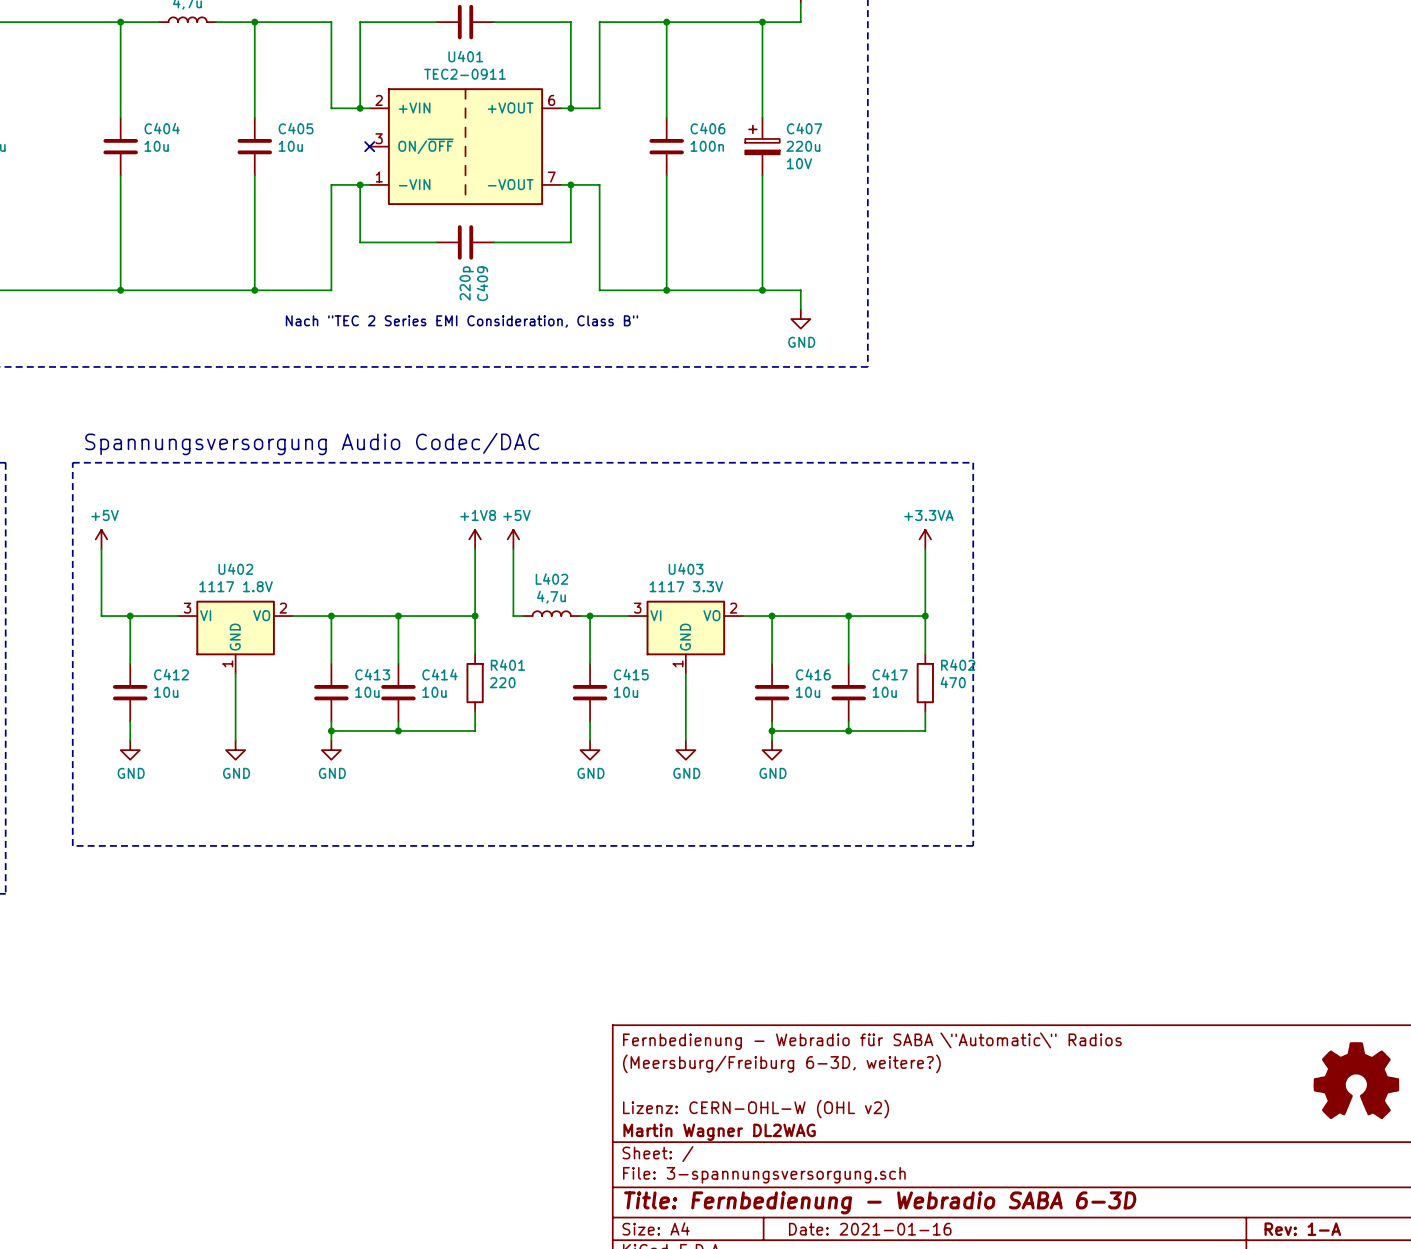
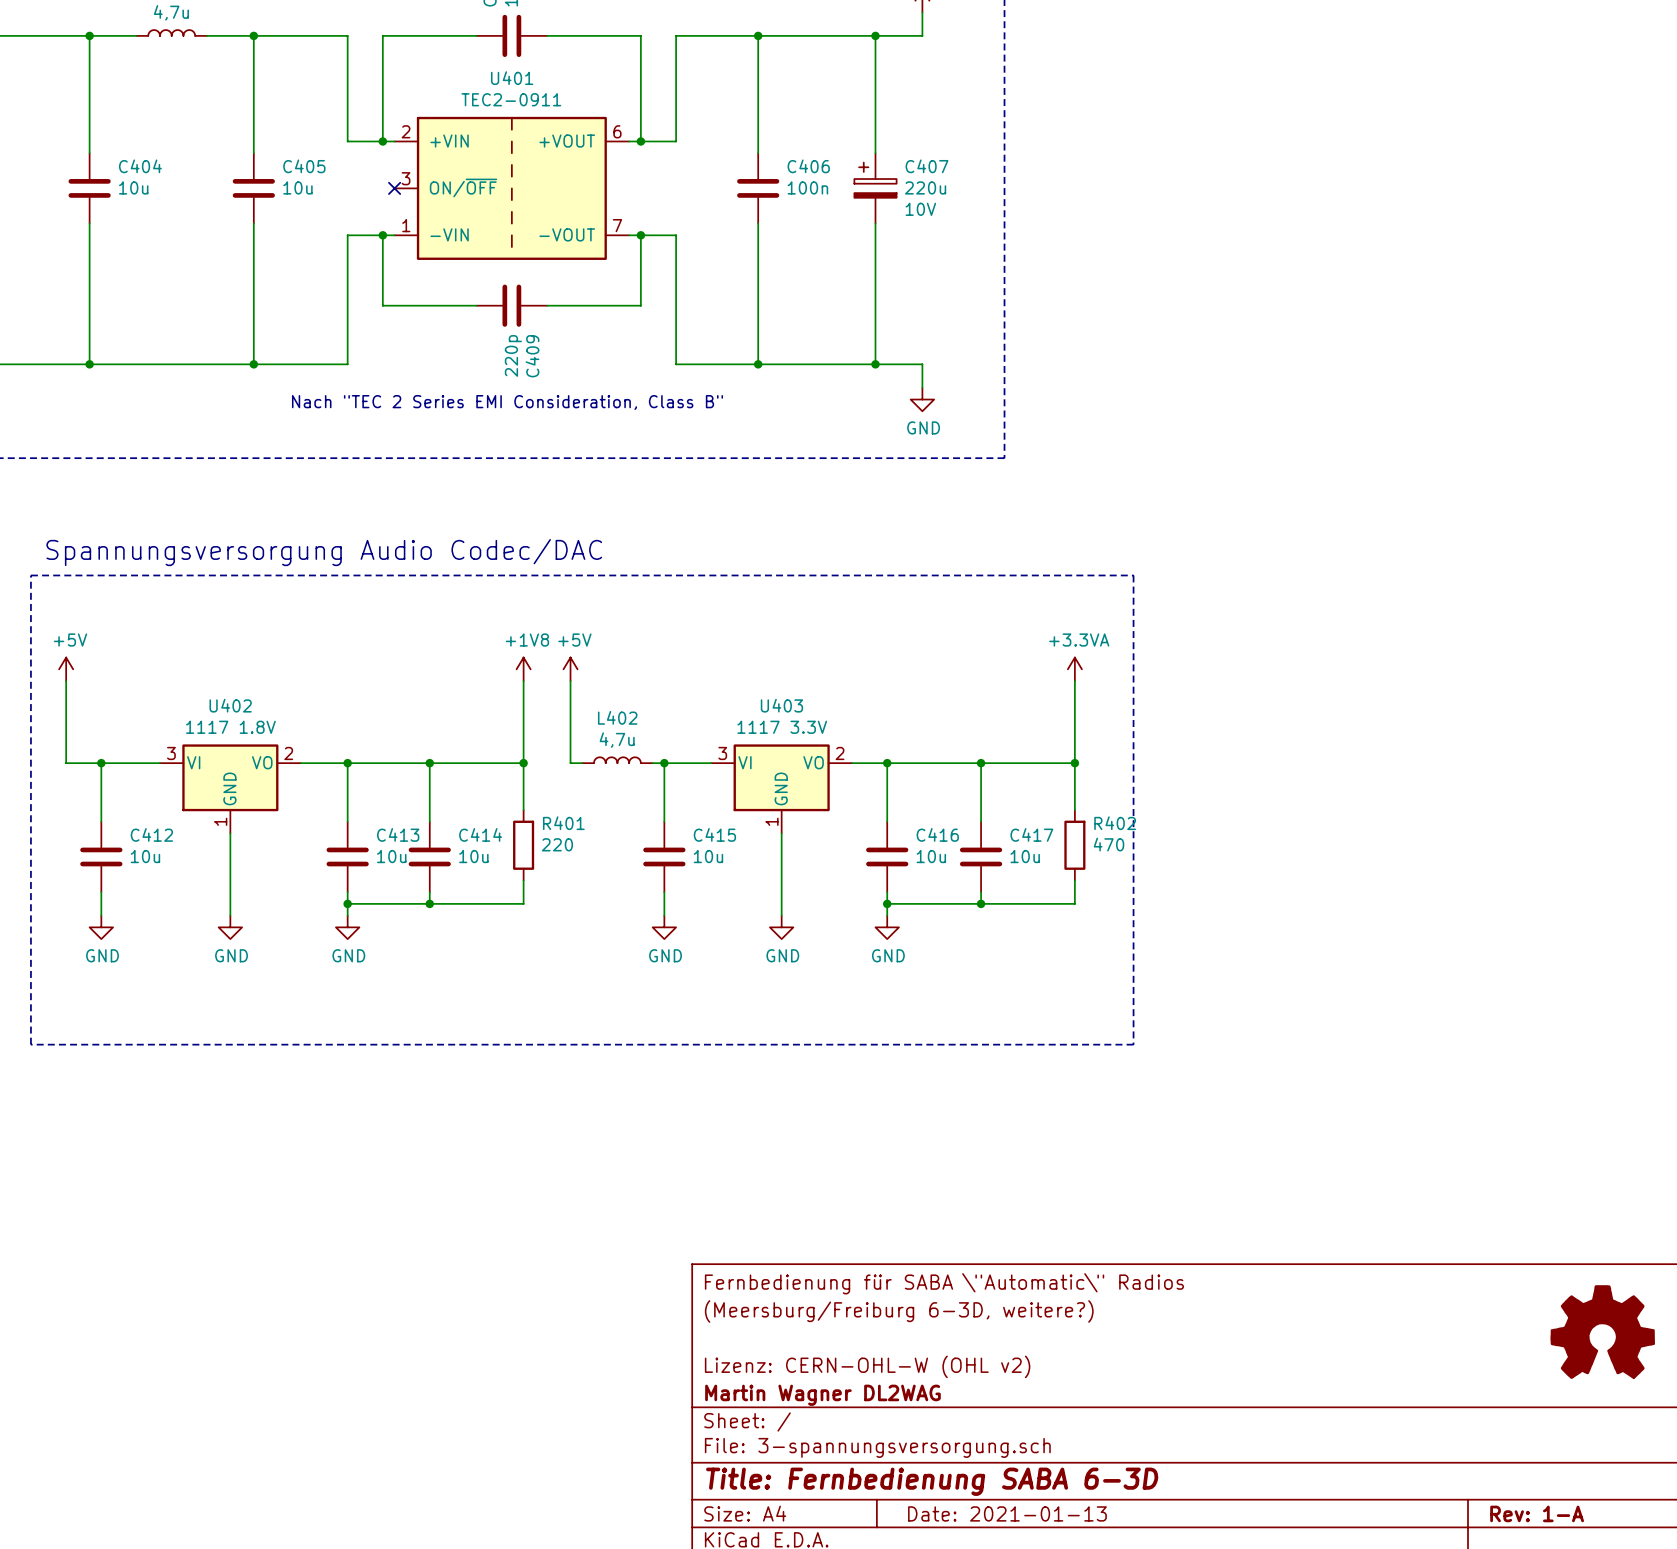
title block: Fernbedienung - Webradio für SABA \"Automatic\" Radios (872, 1041) -> Fernbedienung für SABA \"Automatic\" Radios (944, 1283)
title block: Title: Fernbedienung - Webradio SABA 6-3D (880, 1202) -> Title: Fernbedienung SABA 6-3D (932, 1481)
title block: Date: 2021-01-16 (870, 1229) -> Date: 2021-01-13 (1007, 1513)

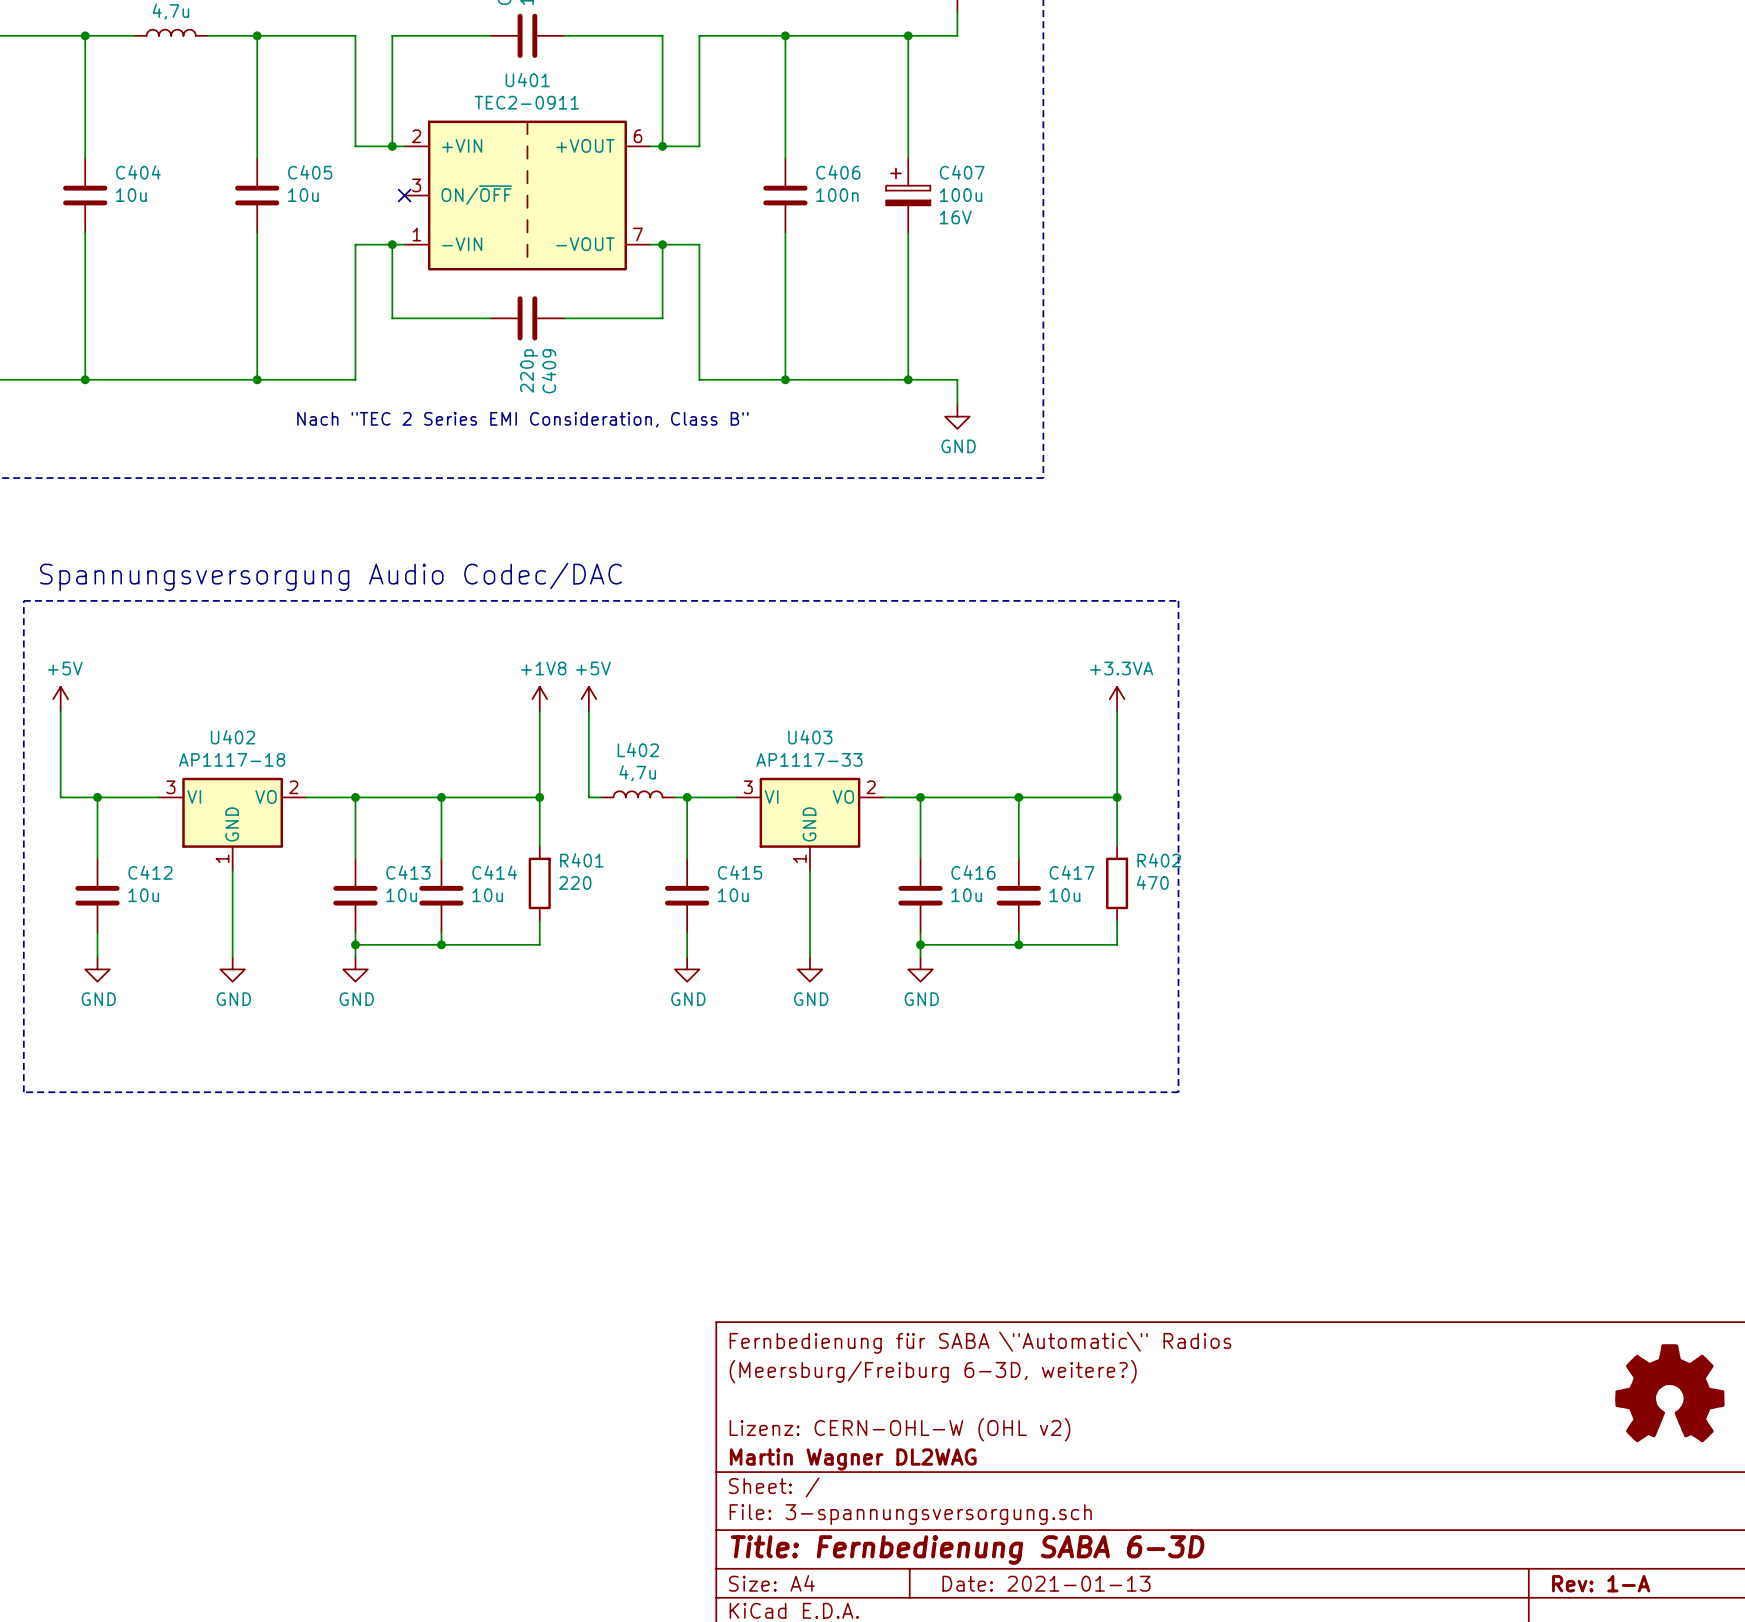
C407 value: 220u (925, 187) -> 100u (961, 195)
C407 text: 10V (920, 209) -> 16V (955, 217)
U402 value: 1117 1.8V (230, 727) -> AP1117-18 (232, 759)
U403 value: 1117 3.3V (782, 727) -> AP1117-33 (809, 759)

